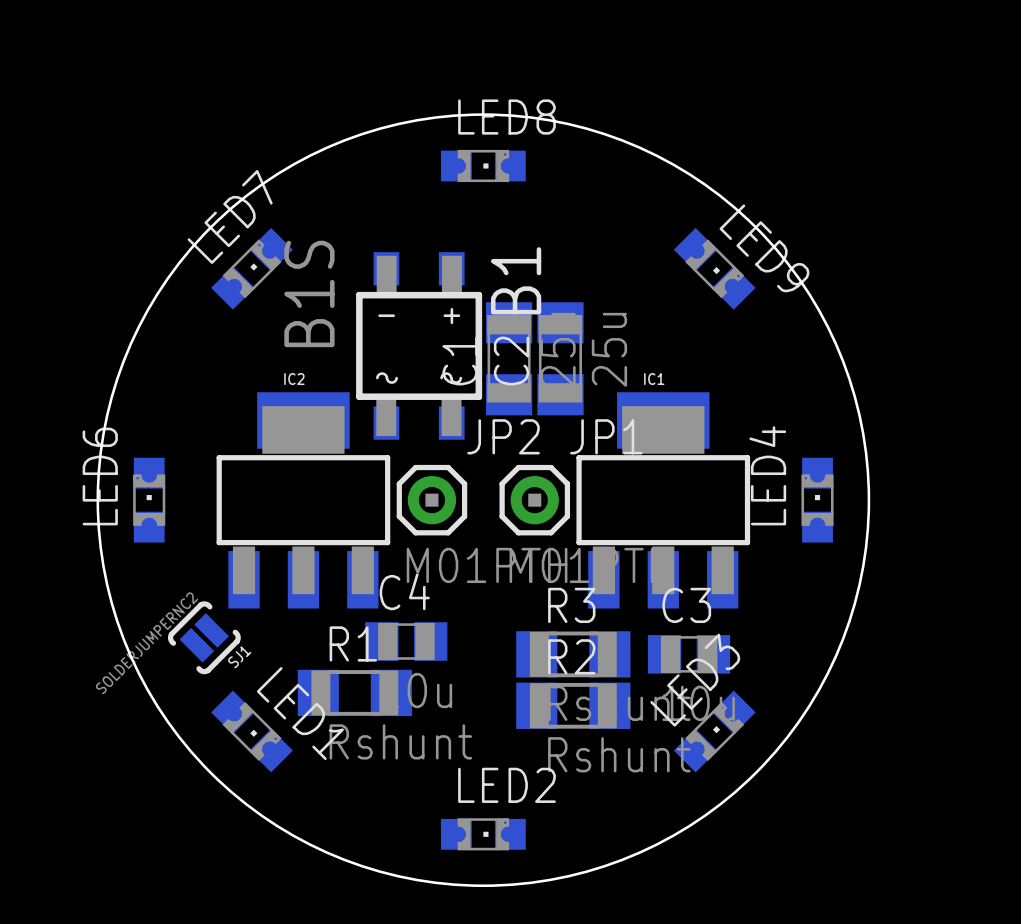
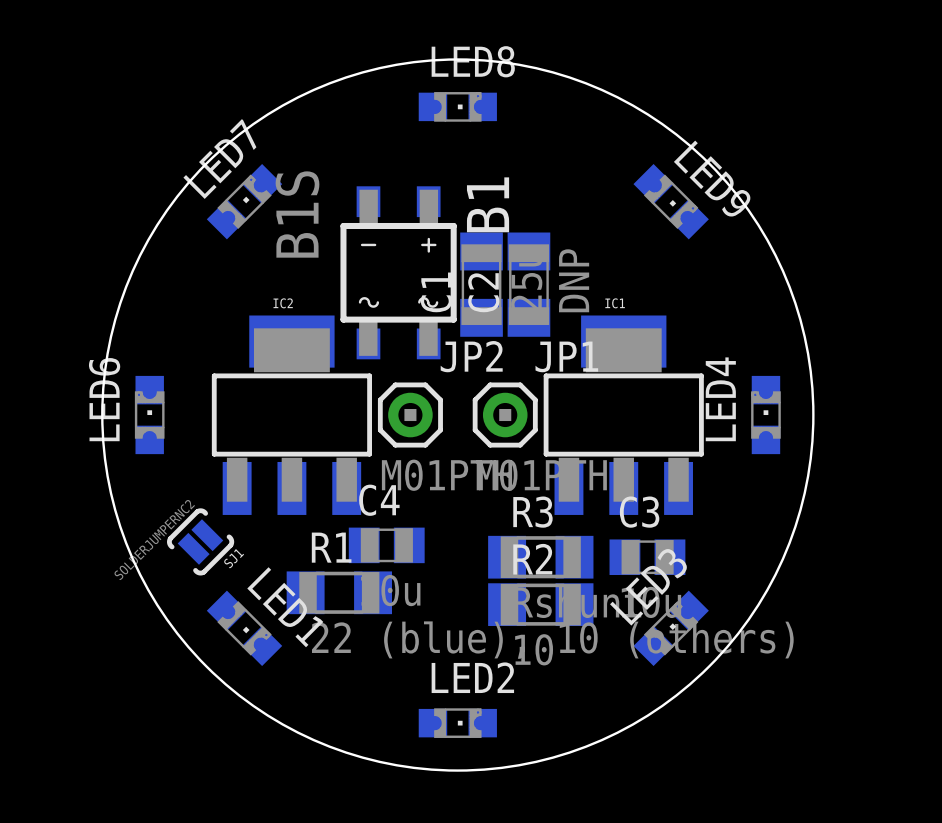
C2 value: 25u (609, 349) -> DNP (574, 280)
R1 value: Rshunt (400, 741) -> 22 (blue), 10 (others) (552, 640)
R2 value: Rshunt (619, 754) -> 10 (534, 649)

